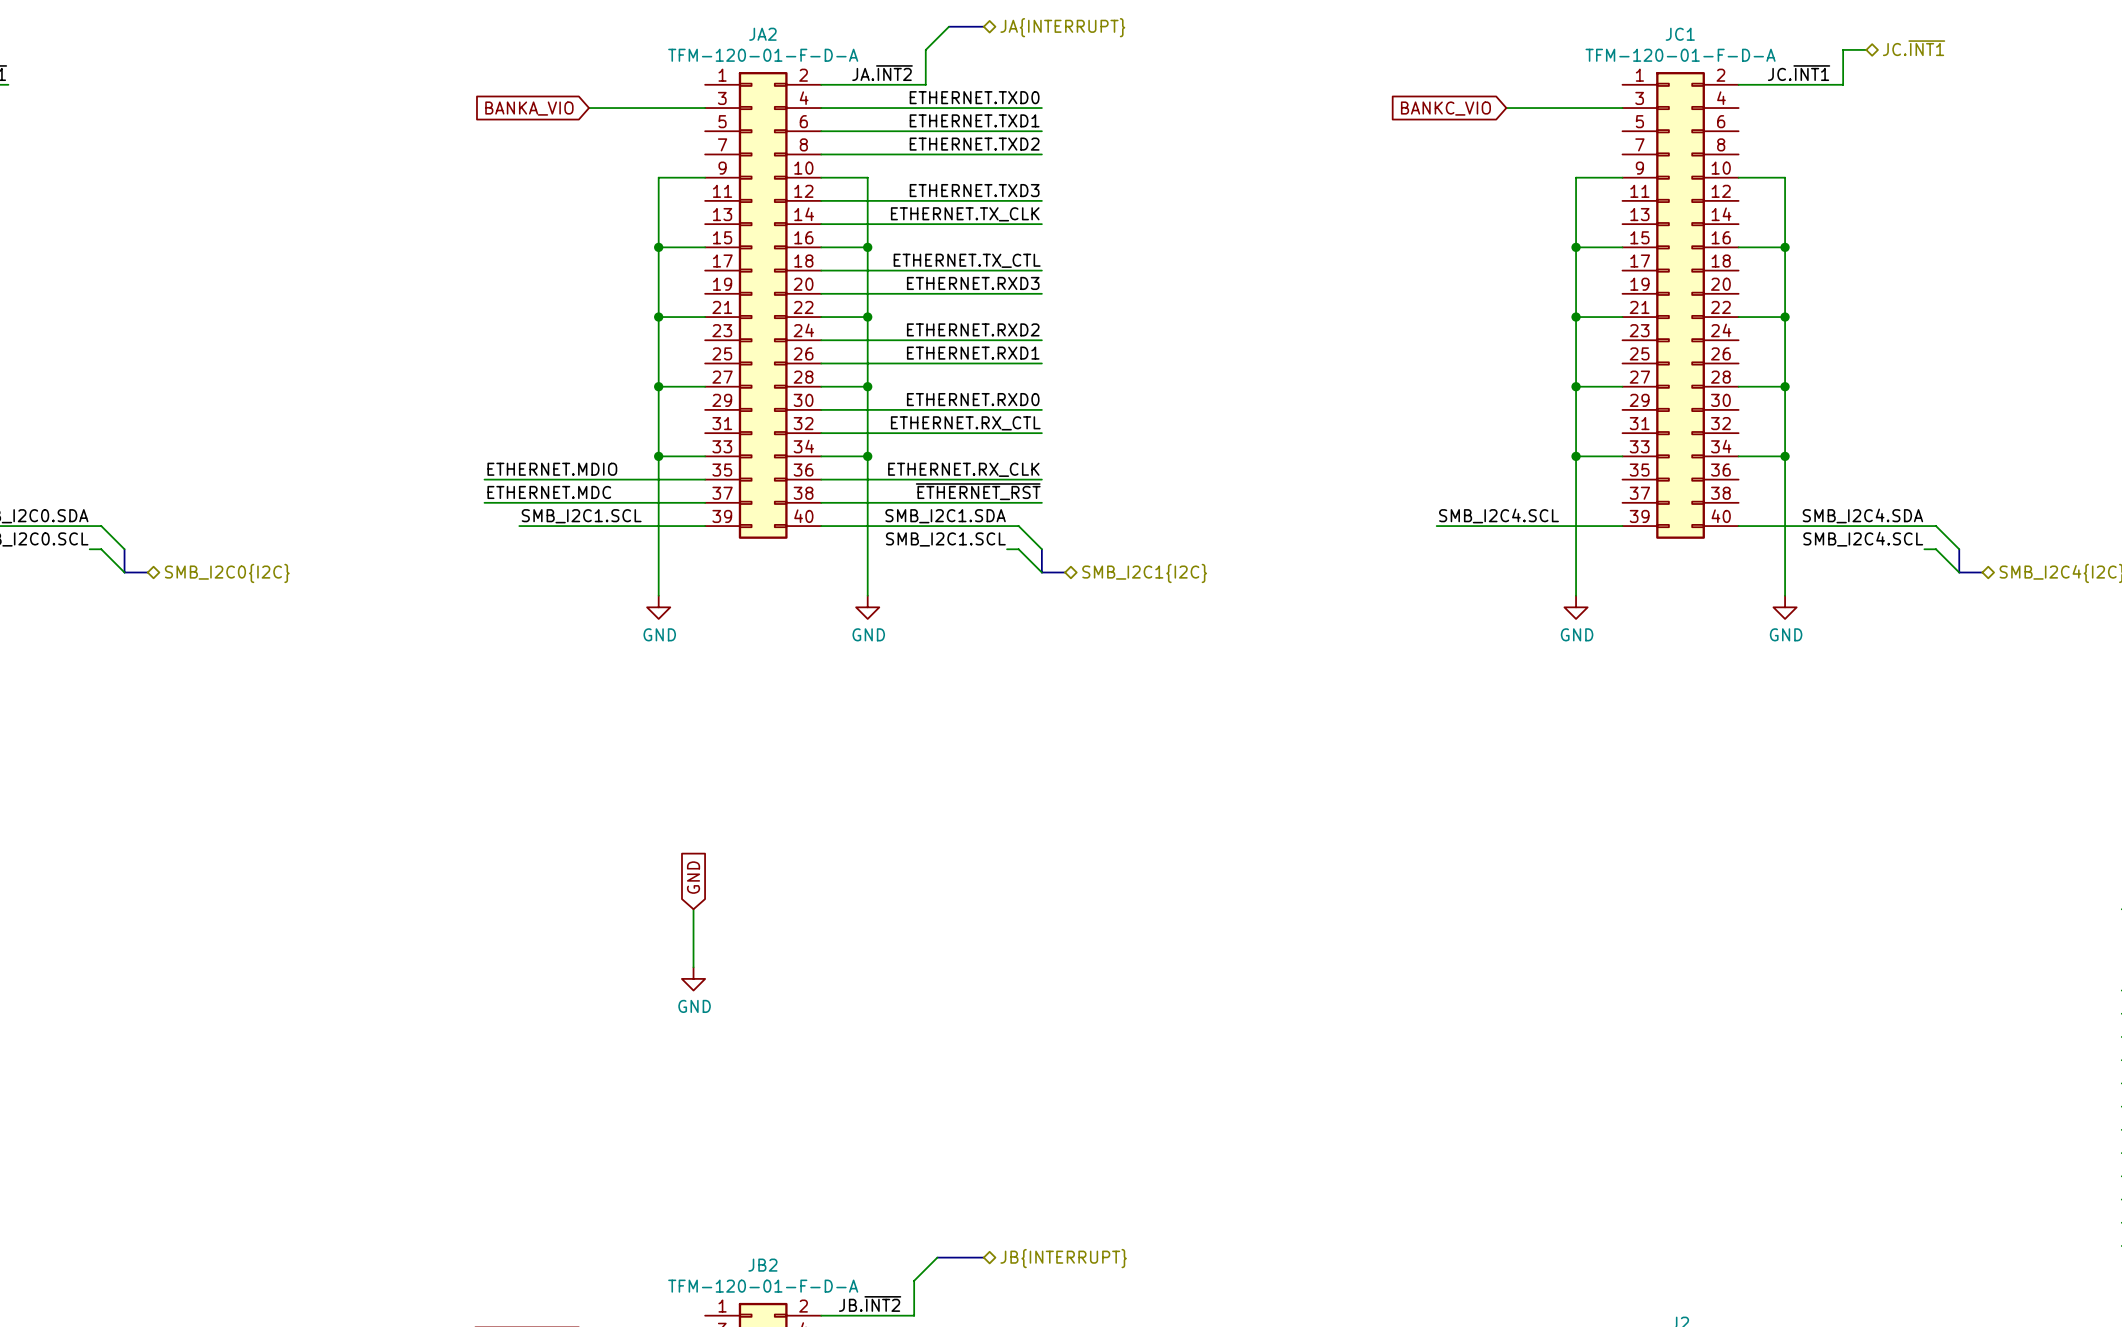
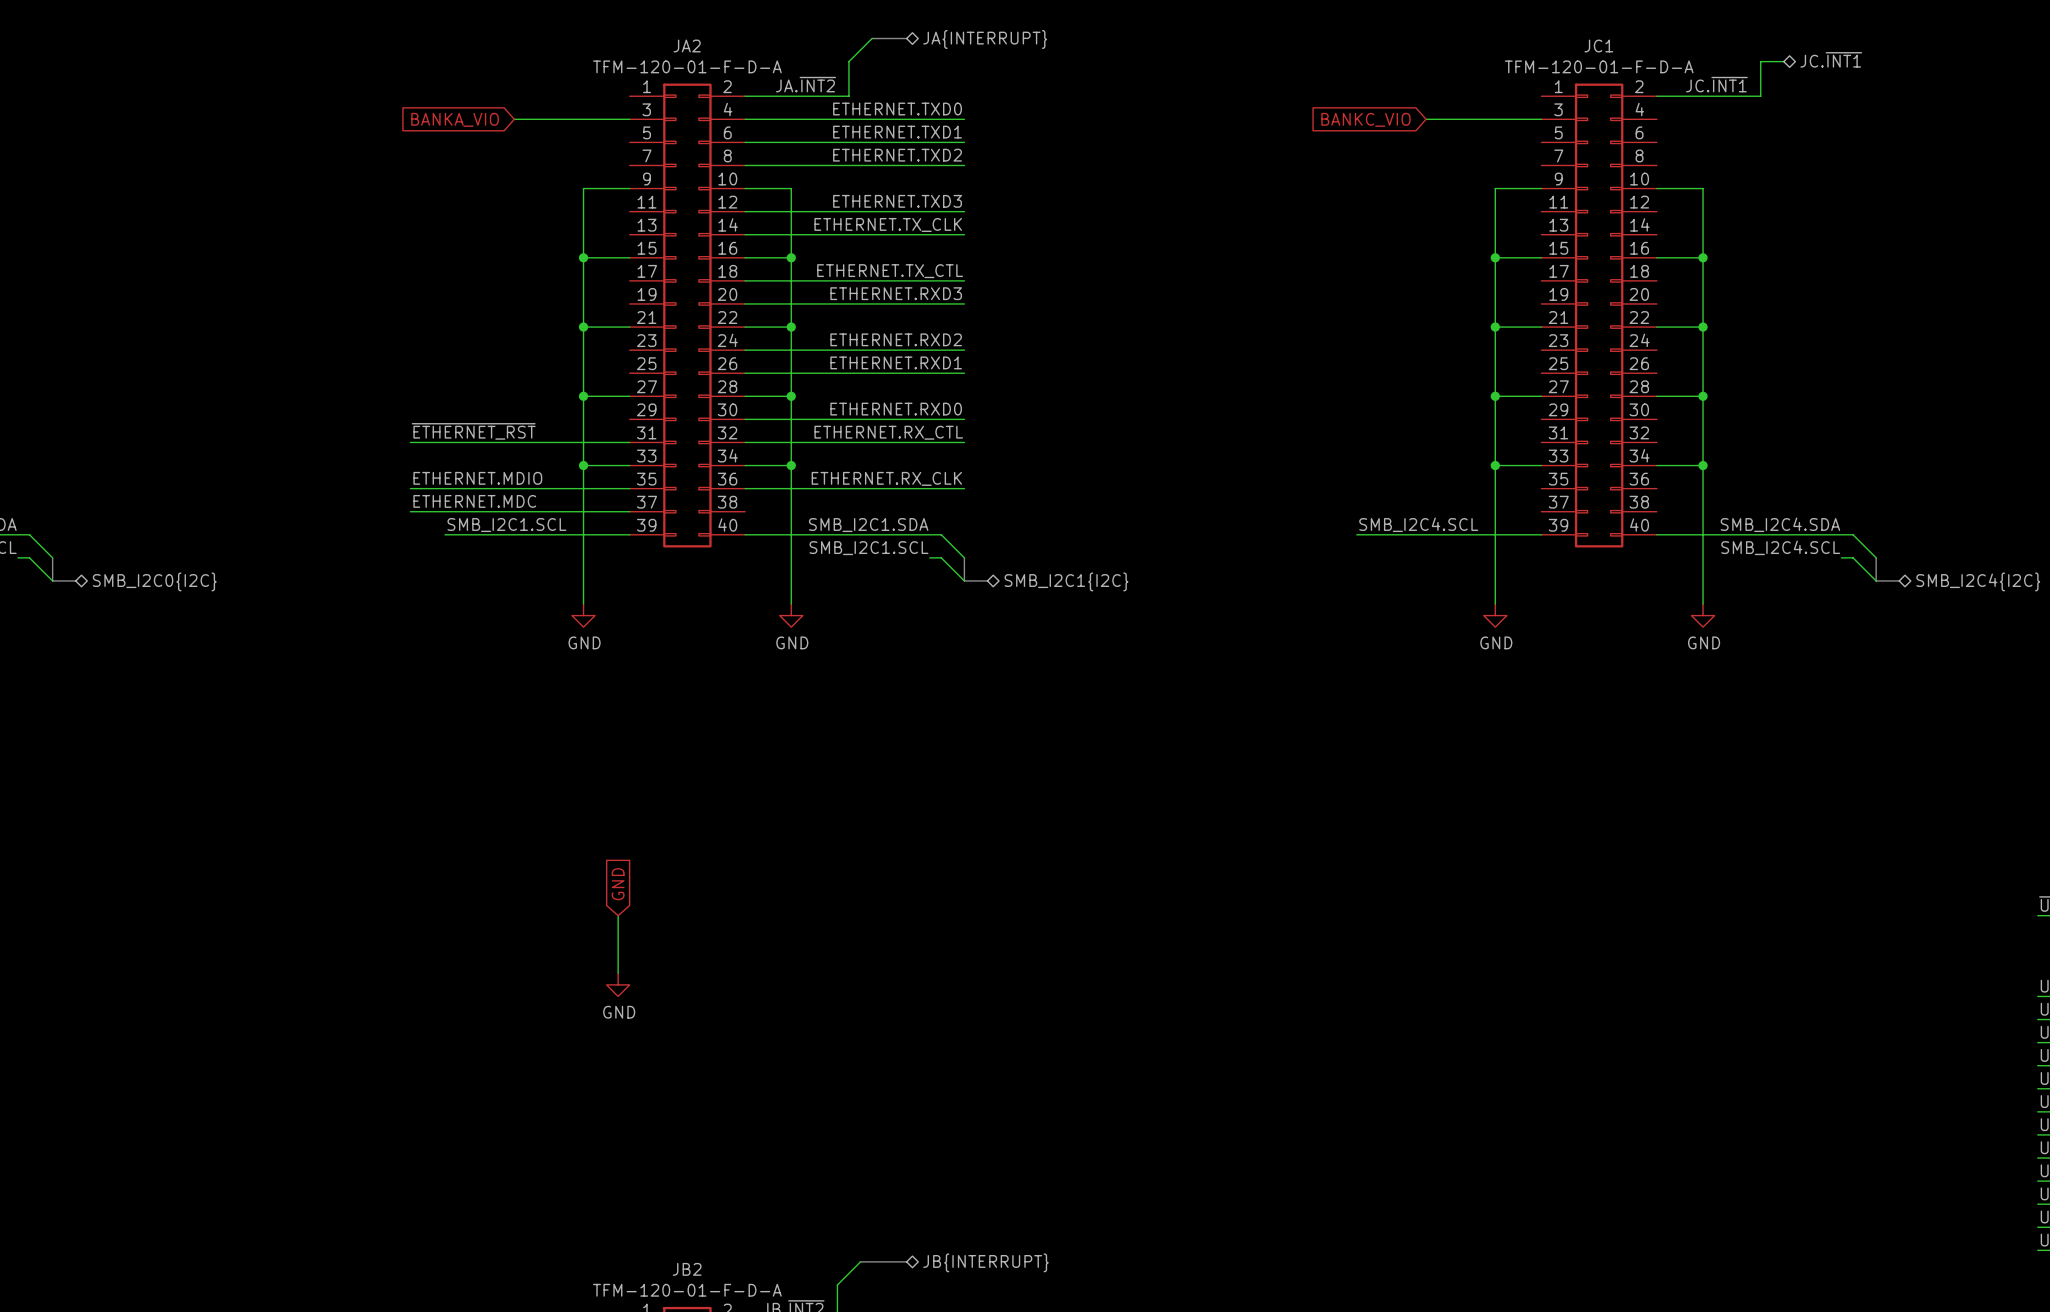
label: none -> ~{ETHERNET_RST} (473, 431)
wire: none -> (410, 442) (629, 442)
label: ~{ETHERNET_RST} (978, 491) -> none
wire: (821, 502) (1041, 502) -> none

